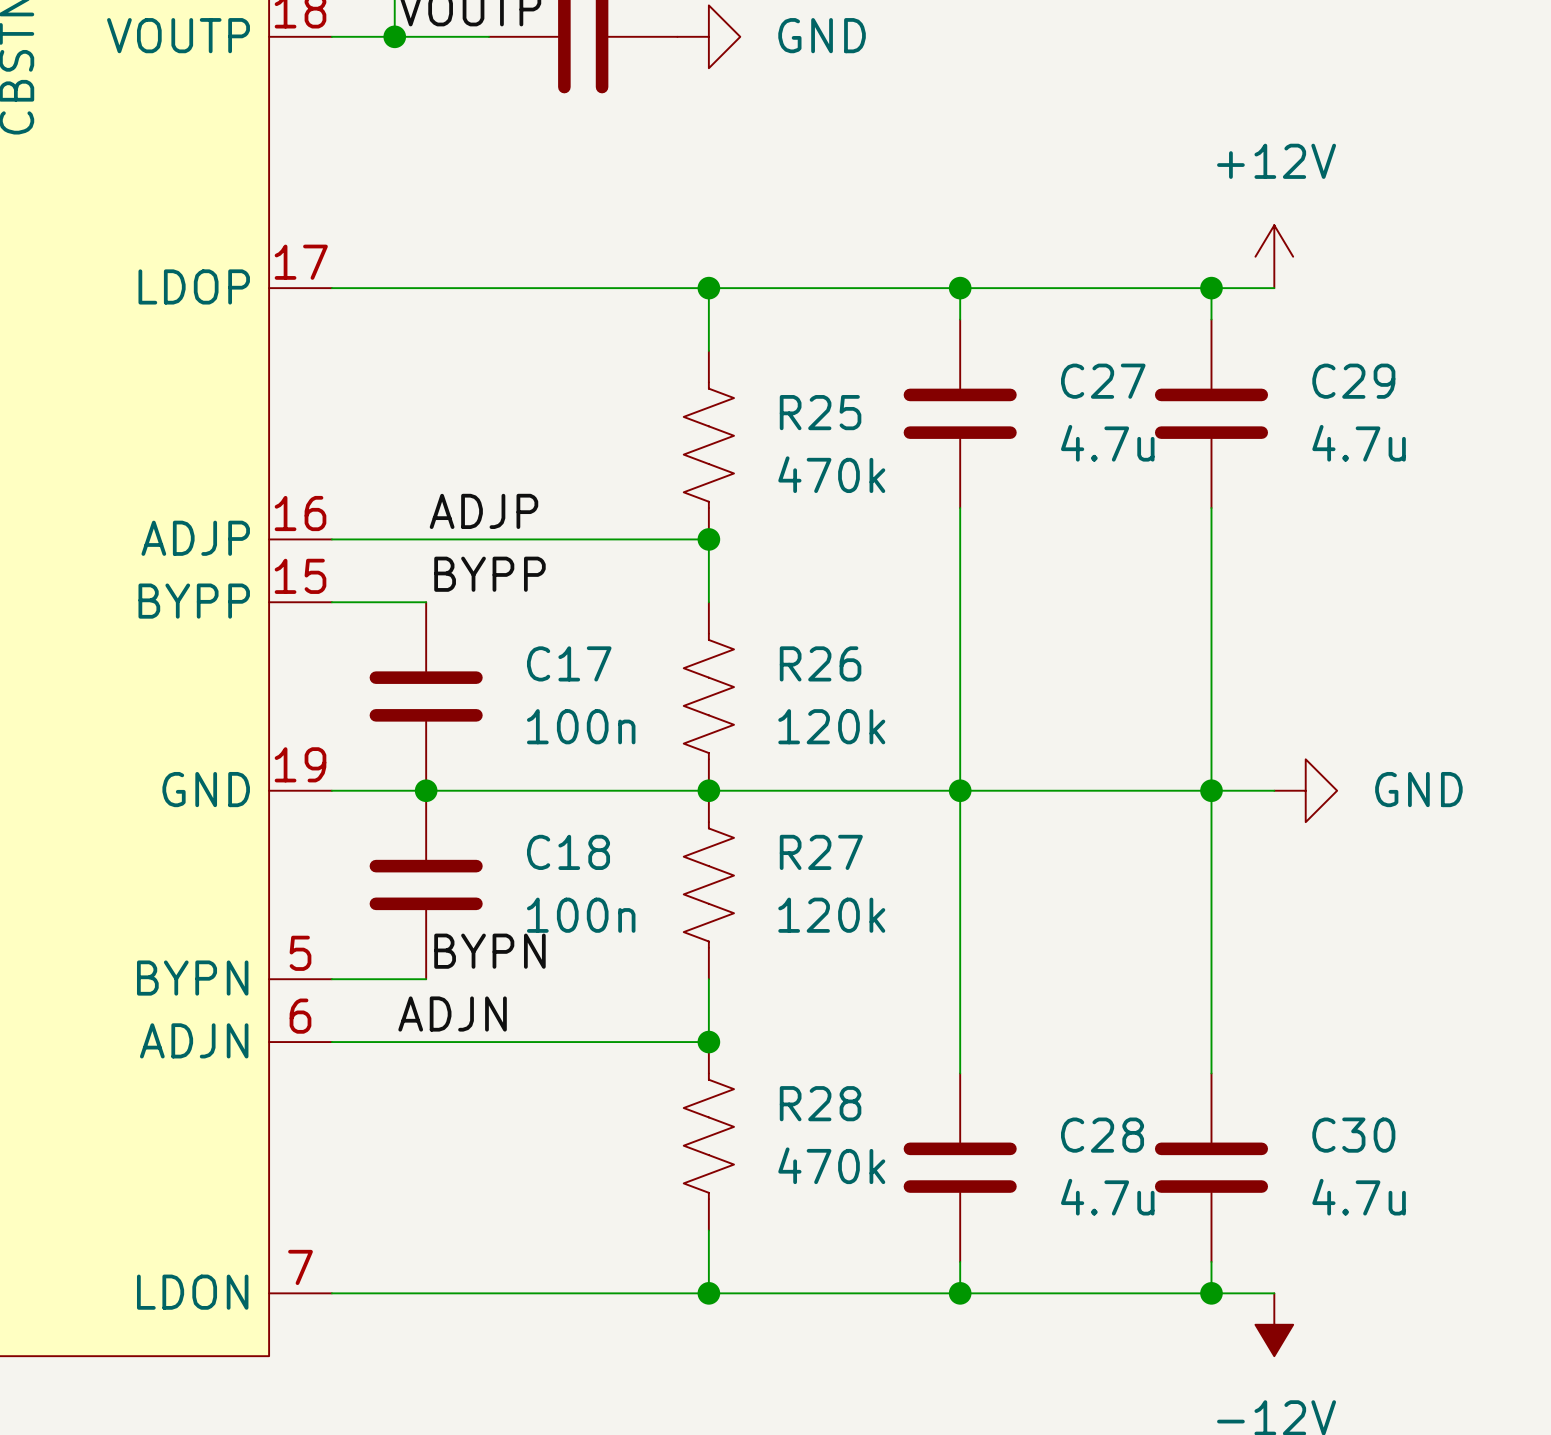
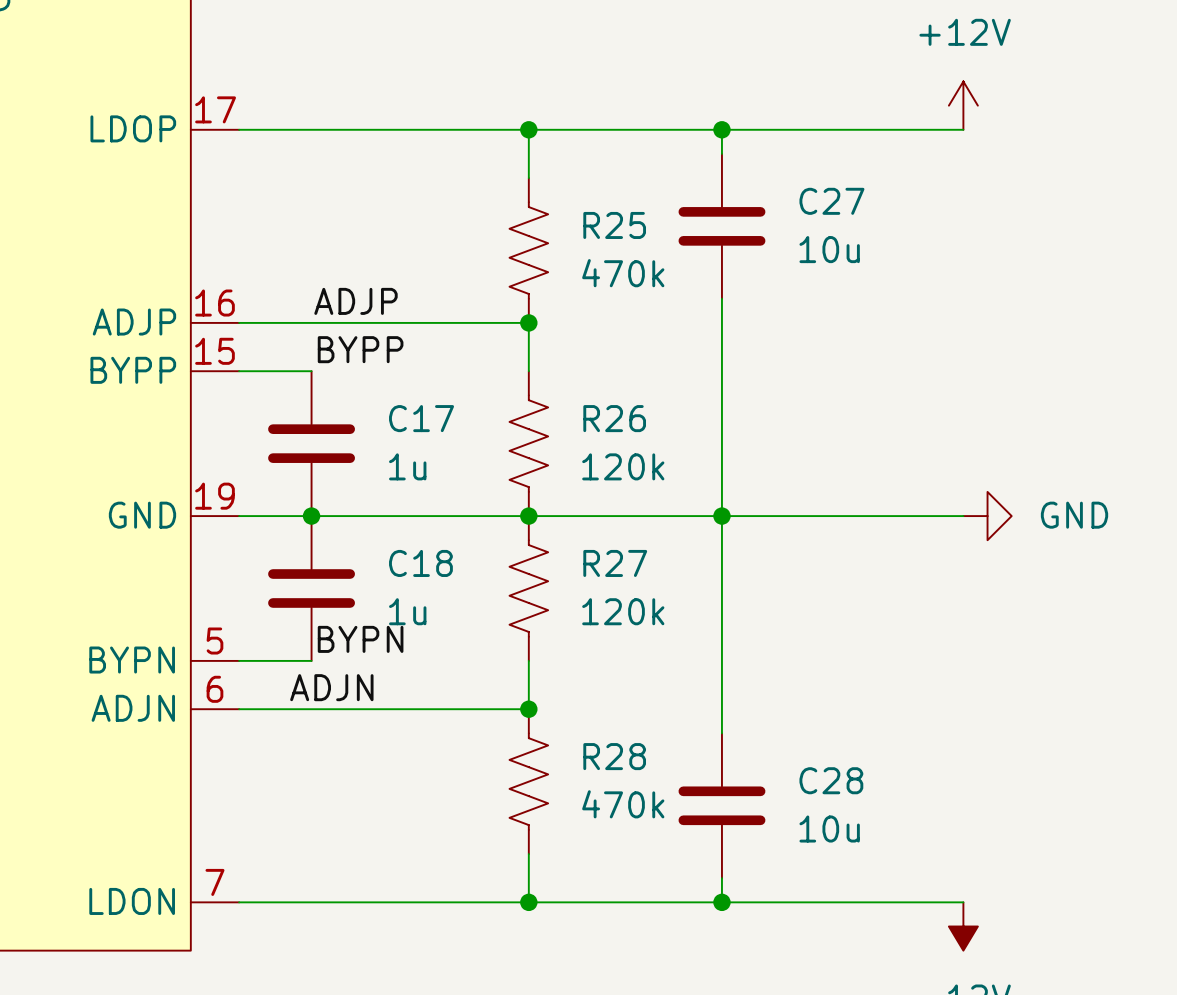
wire: (1211, 288) (1211, 319) -> none
junction: (1211, 288) -> none
C29: 4.7u (1211, 413) -> none
C27 value: 4.7u (1107, 443) -> 10u (829, 249)
wire: (1211, 508) (1211, 1073) -> none
C17 value: 100n (581, 726) -> 1u (407, 466)
junction: (1211, 790) -> none
C18 value: 100n (581, 915) -> 1u (407, 611)
C30: 4.7u (1211, 1167) -> none
C28 value: 4.7u (1107, 1197) -> 10u (829, 829)
wire: (1211, 1261) (1211, 1293) -> none
junction: (1211, 1293) -> none

